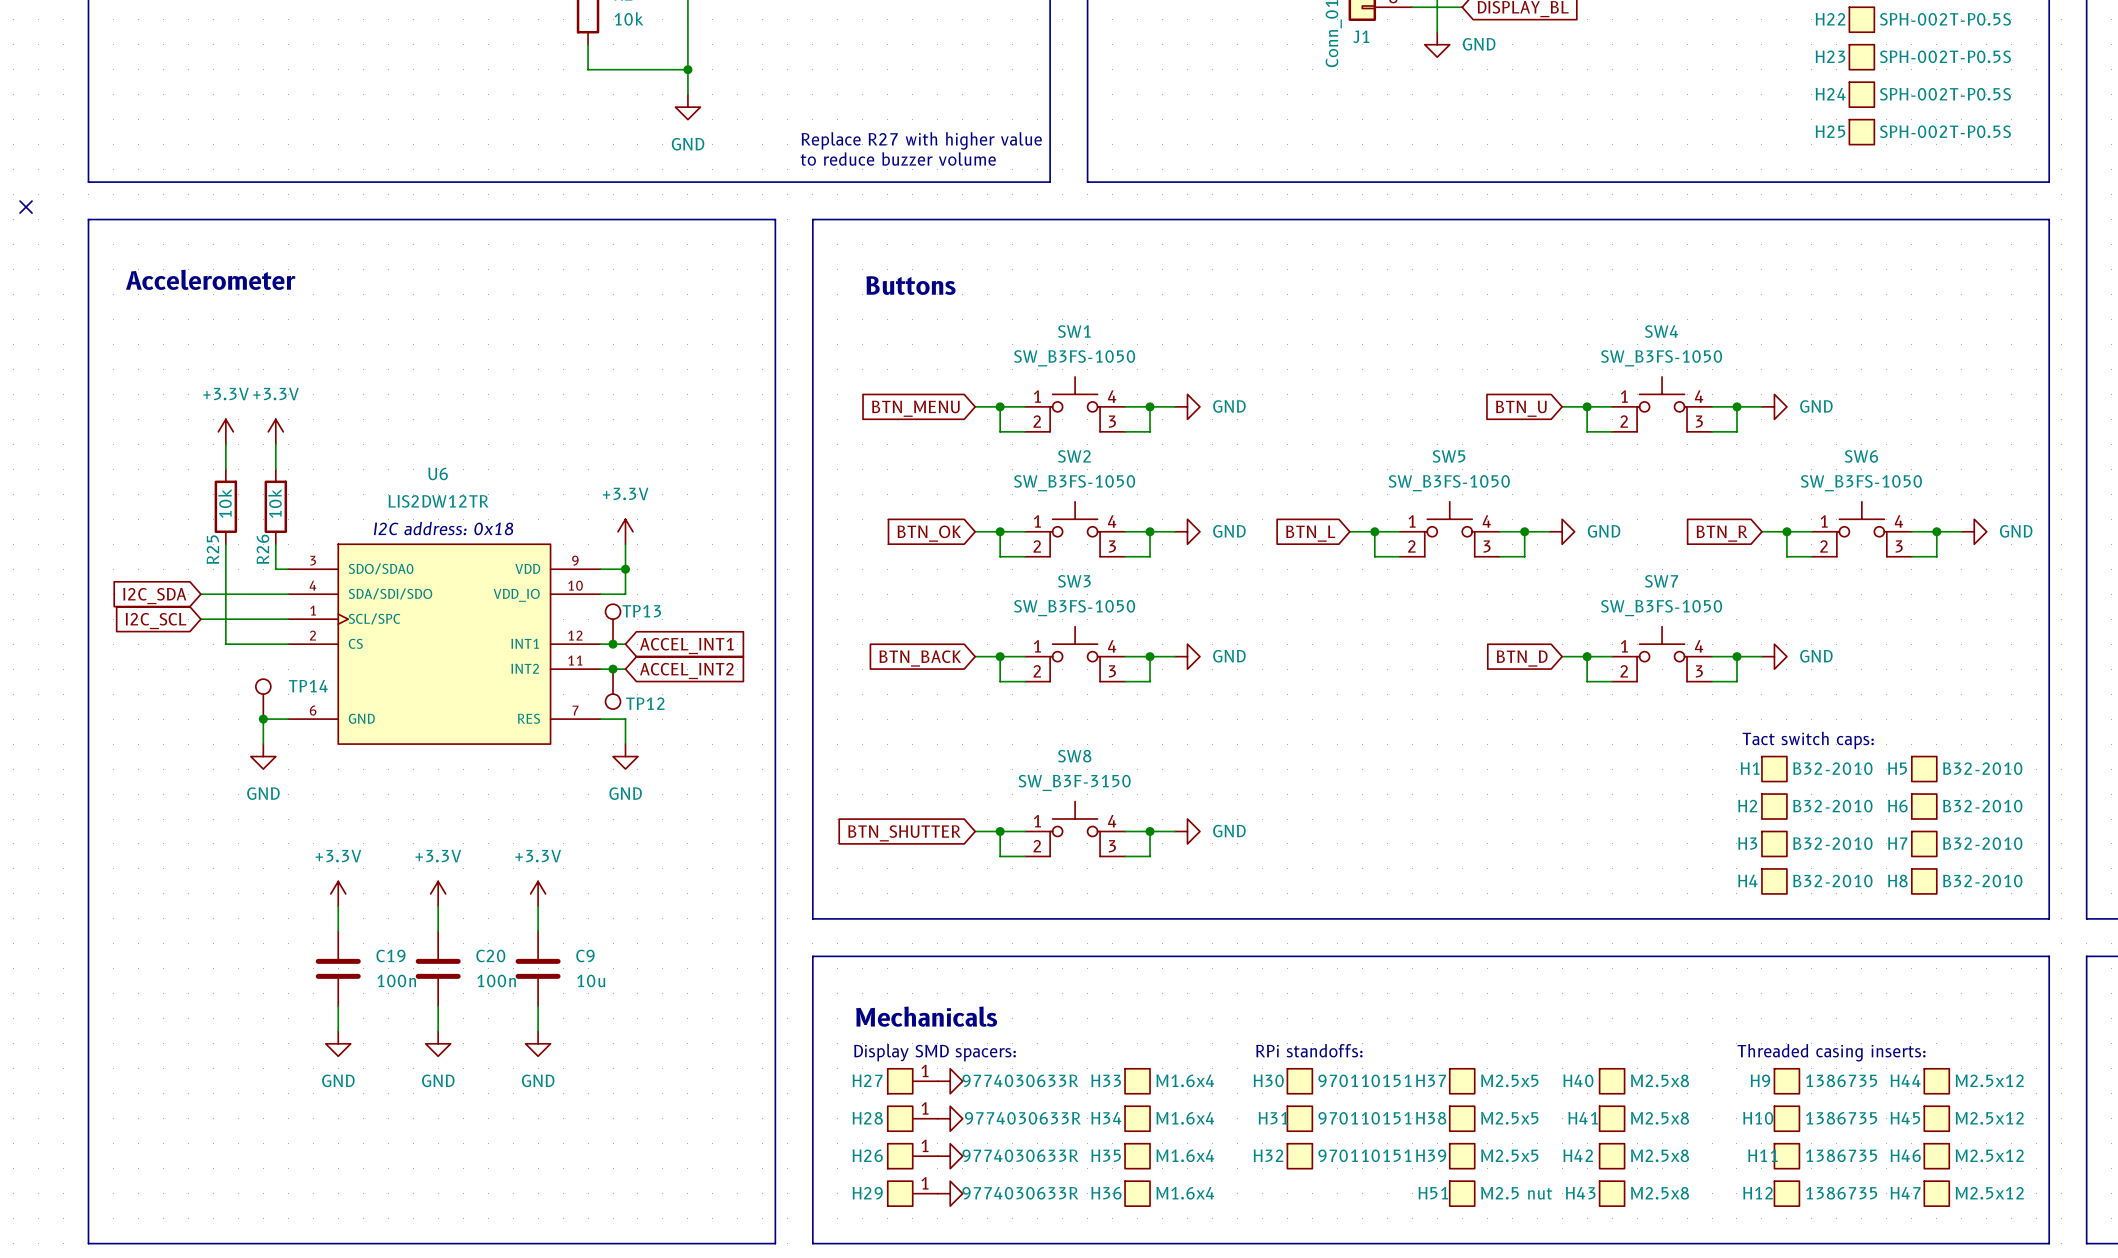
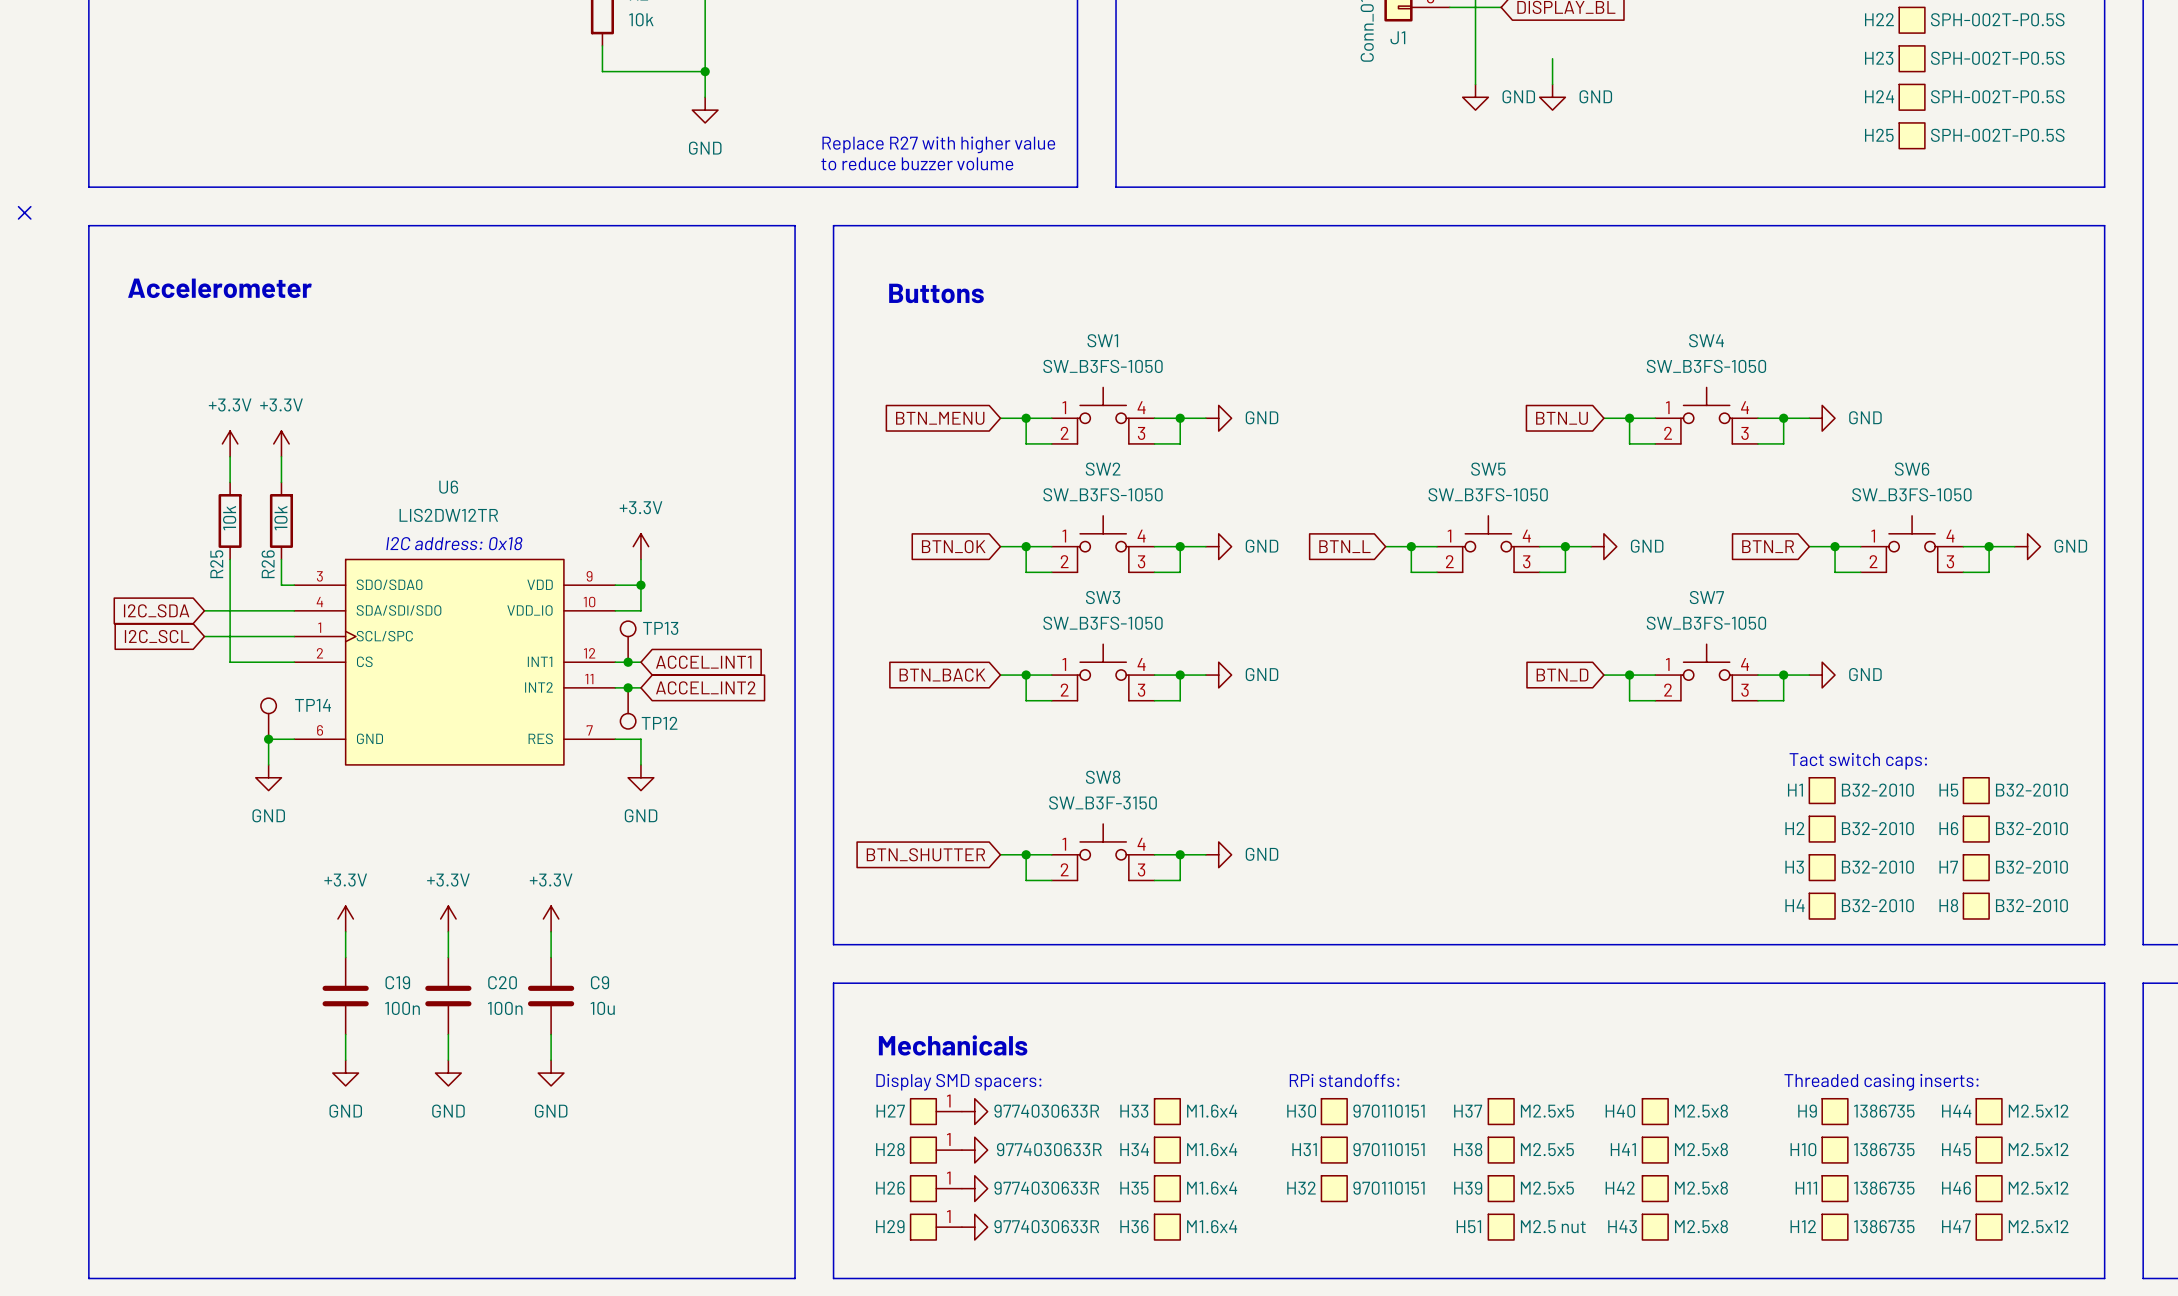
wire: none -> (1475, 33) (1475, 84)
power symbol: GND (1437, 44) -> none
wire: none -> (1552, 58) (1552, 84)
power symbol: none -> GND (1475, 97)
power symbol: none -> GND (1552, 97)

